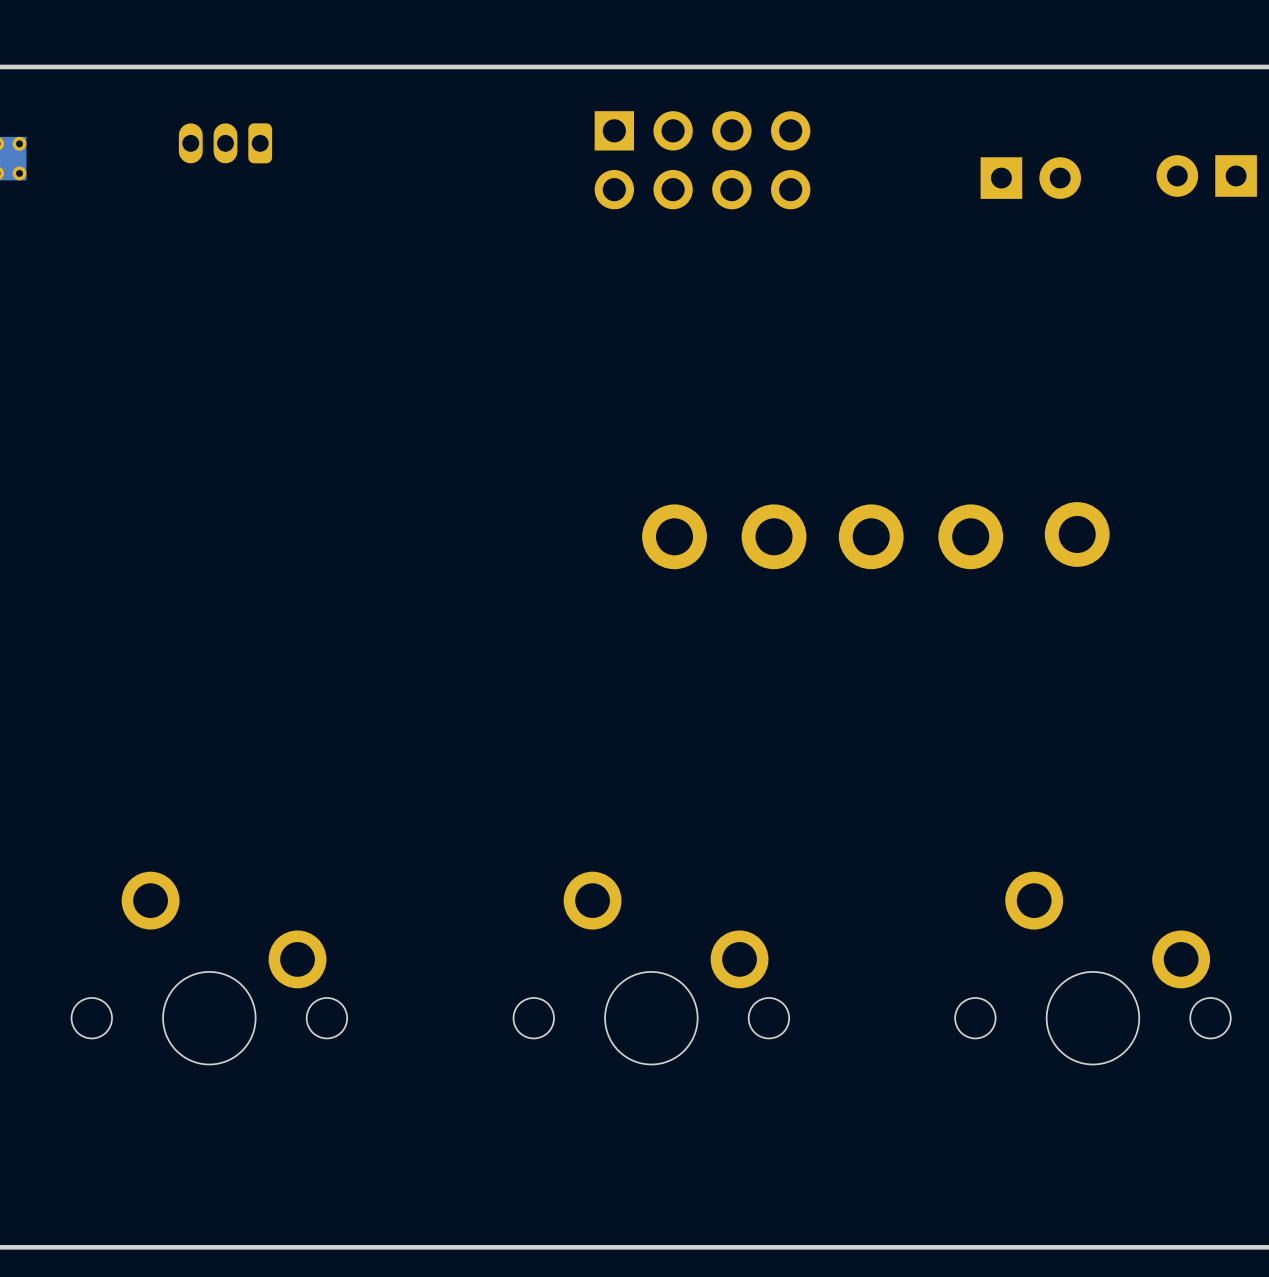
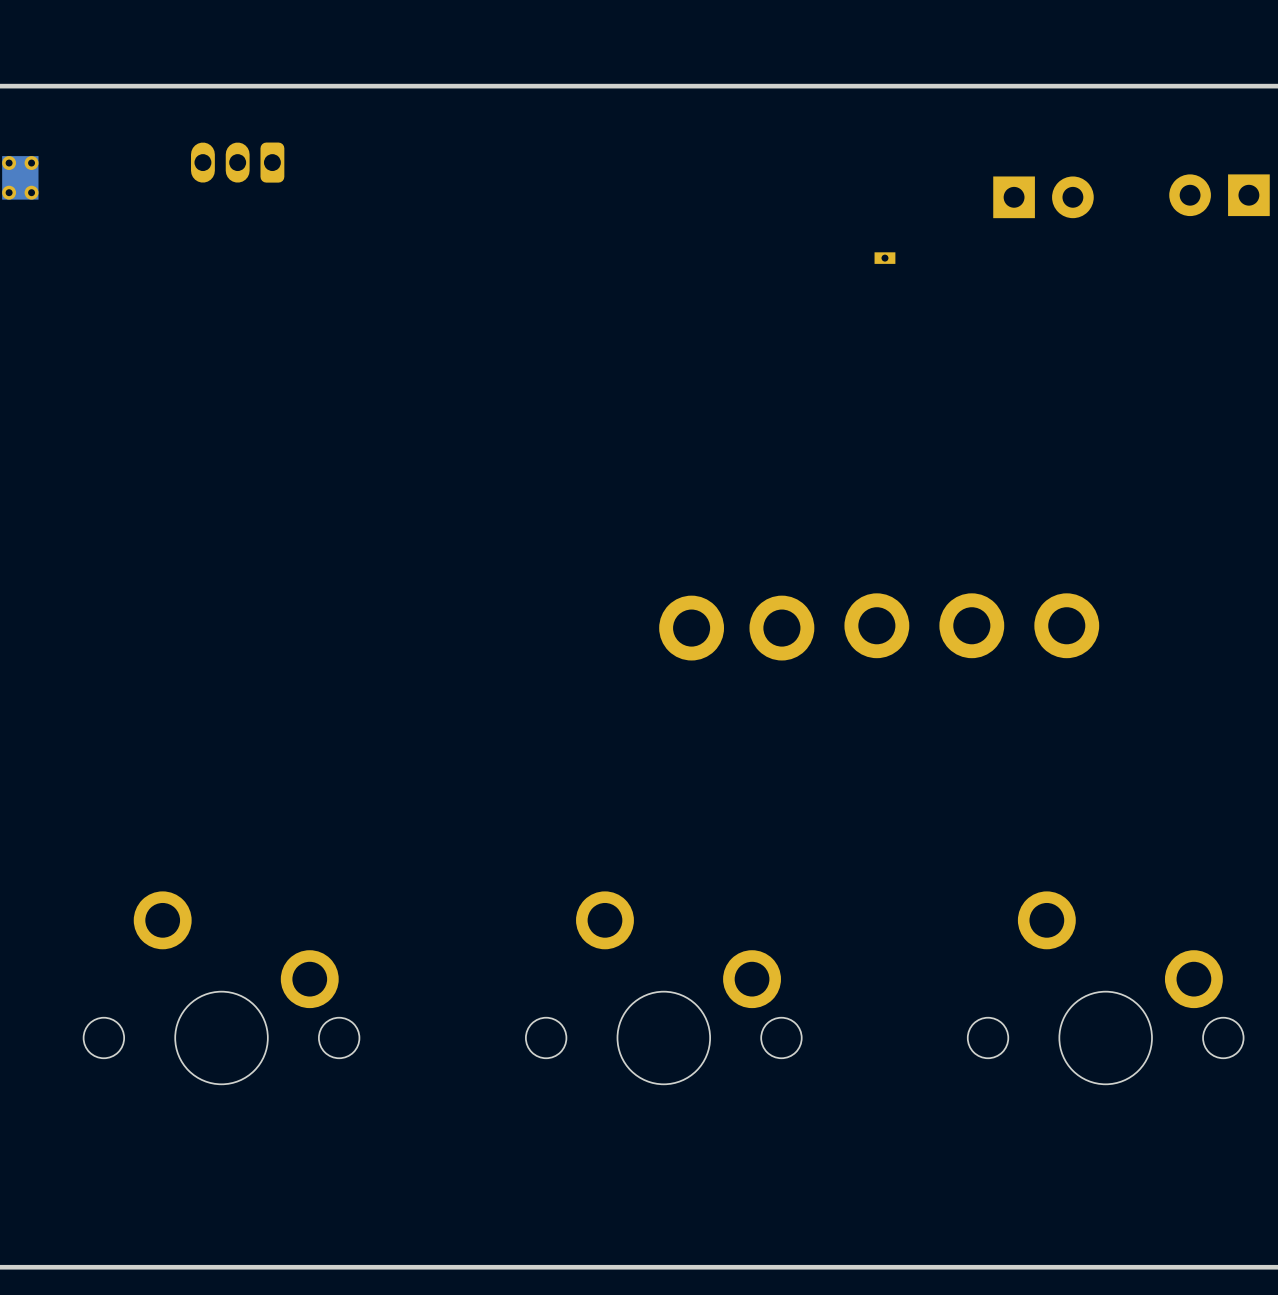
part: (702, 160) -> none
part: none -> (884, 258)
part: (1077, 534) -> none
part: (674, 536) -> none
part: (774, 536) -> none
part: (871, 536) -> none
part: (970, 536) -> none
part: none -> (876, 625)
part: none -> (971, 625)
part: none -> (1066, 625)
part: none -> (691, 628)
part: none -> (781, 628)

